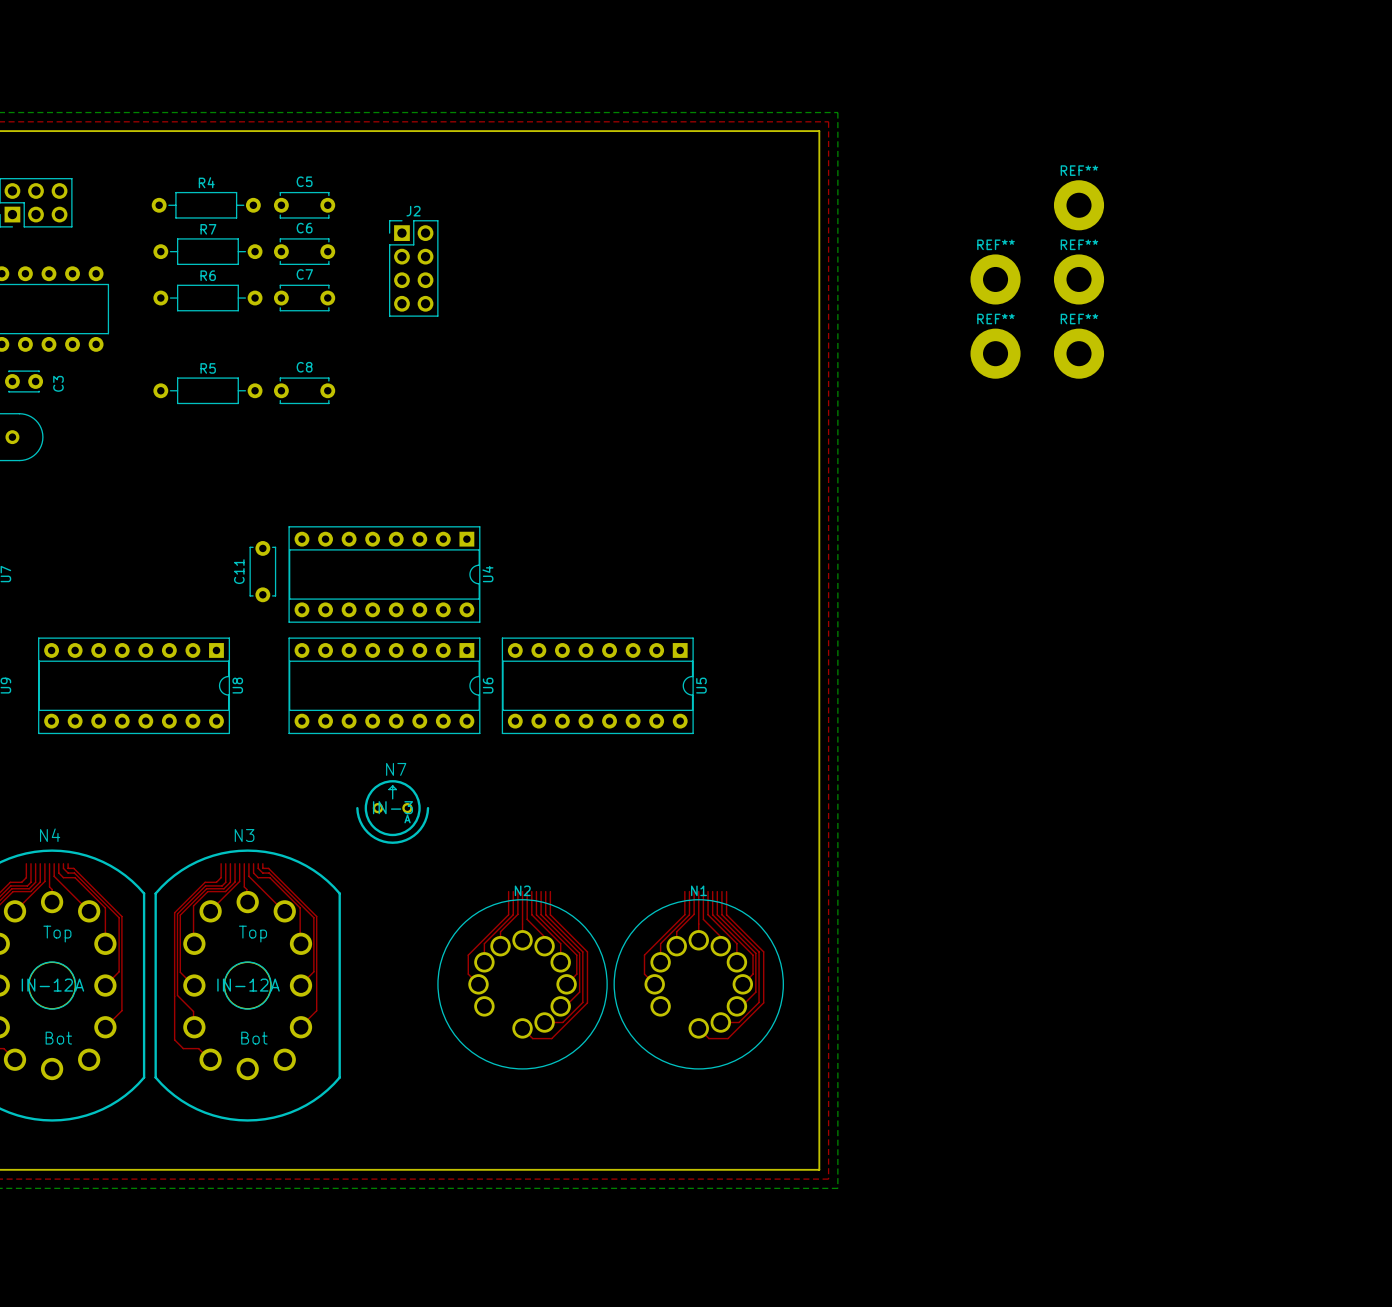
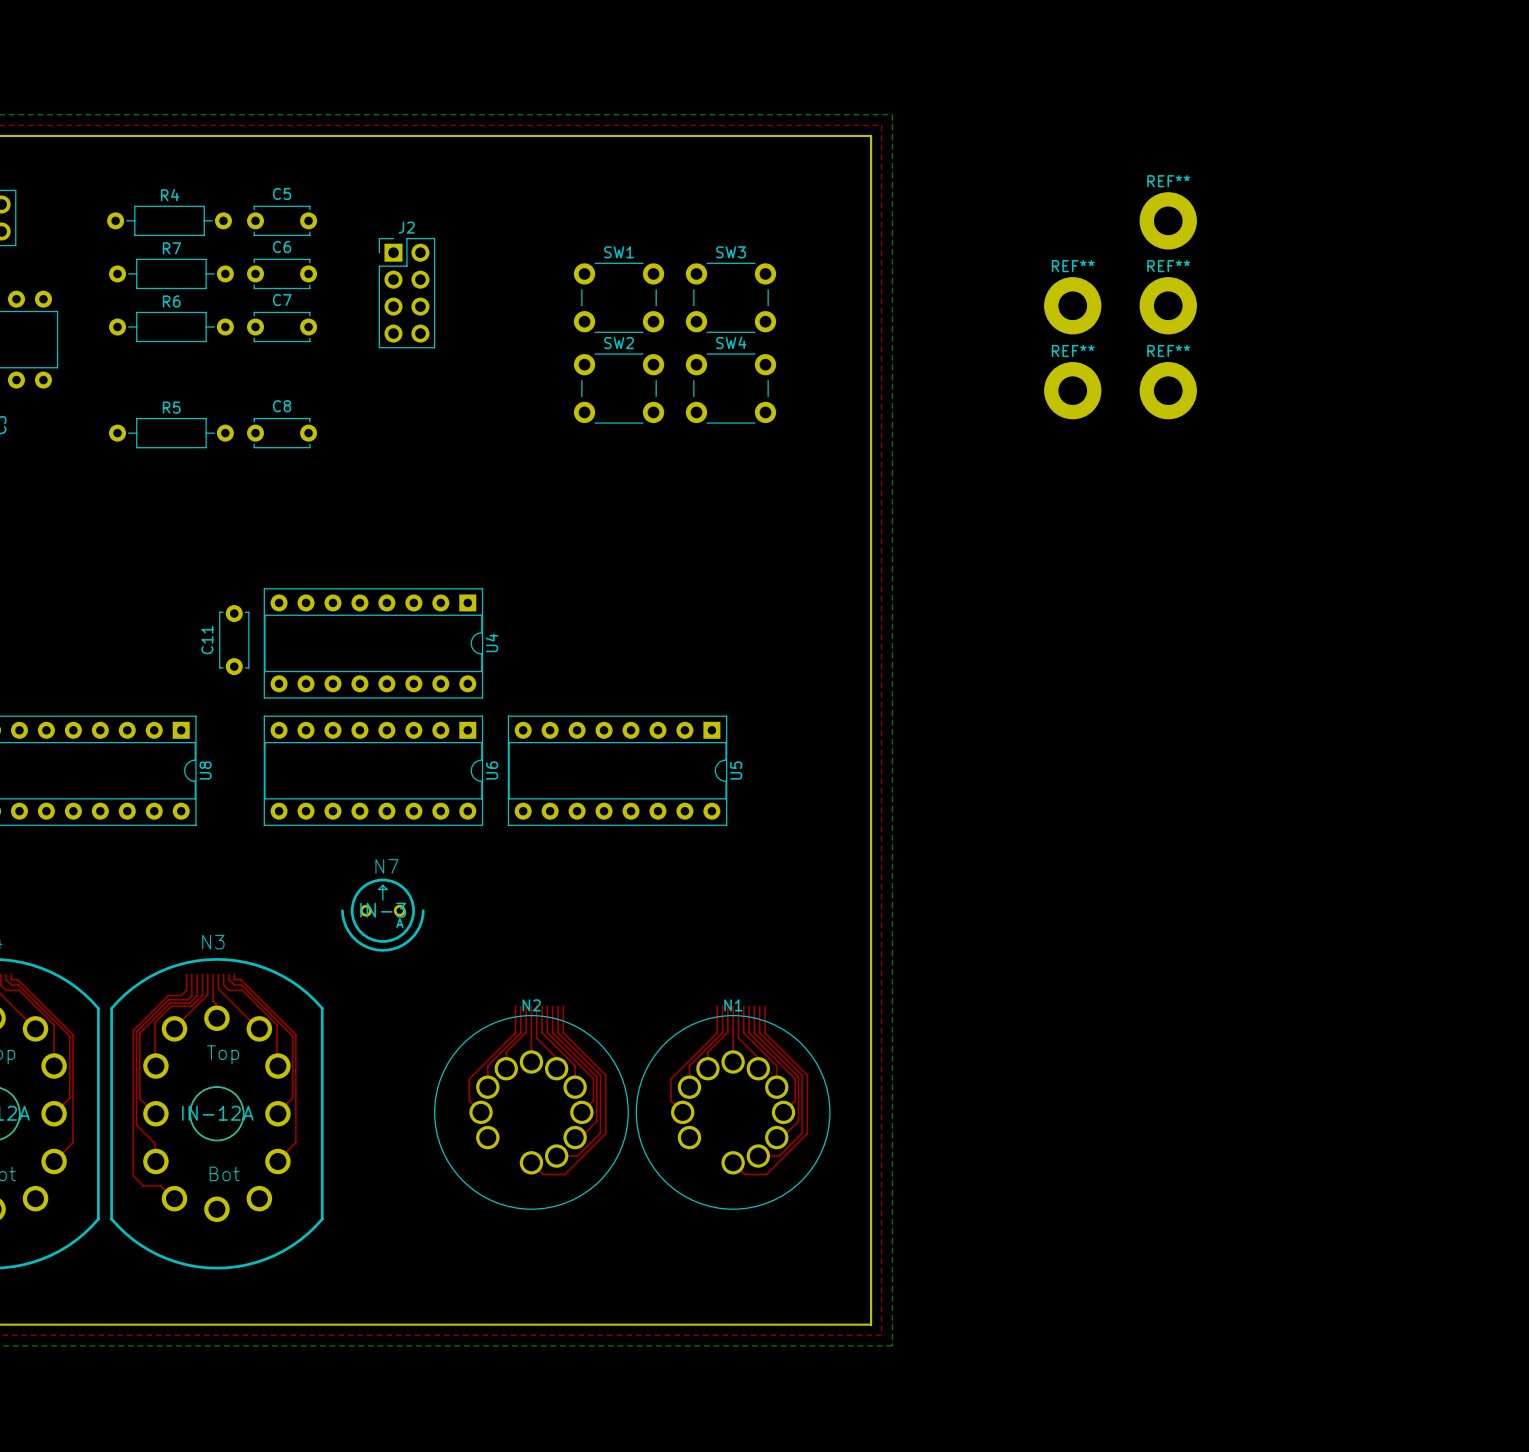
SW1: none -> (619, 297)
SW3: none -> (730, 297)
SW2: none -> (619, 388)
SW4: none -> (730, 388)

